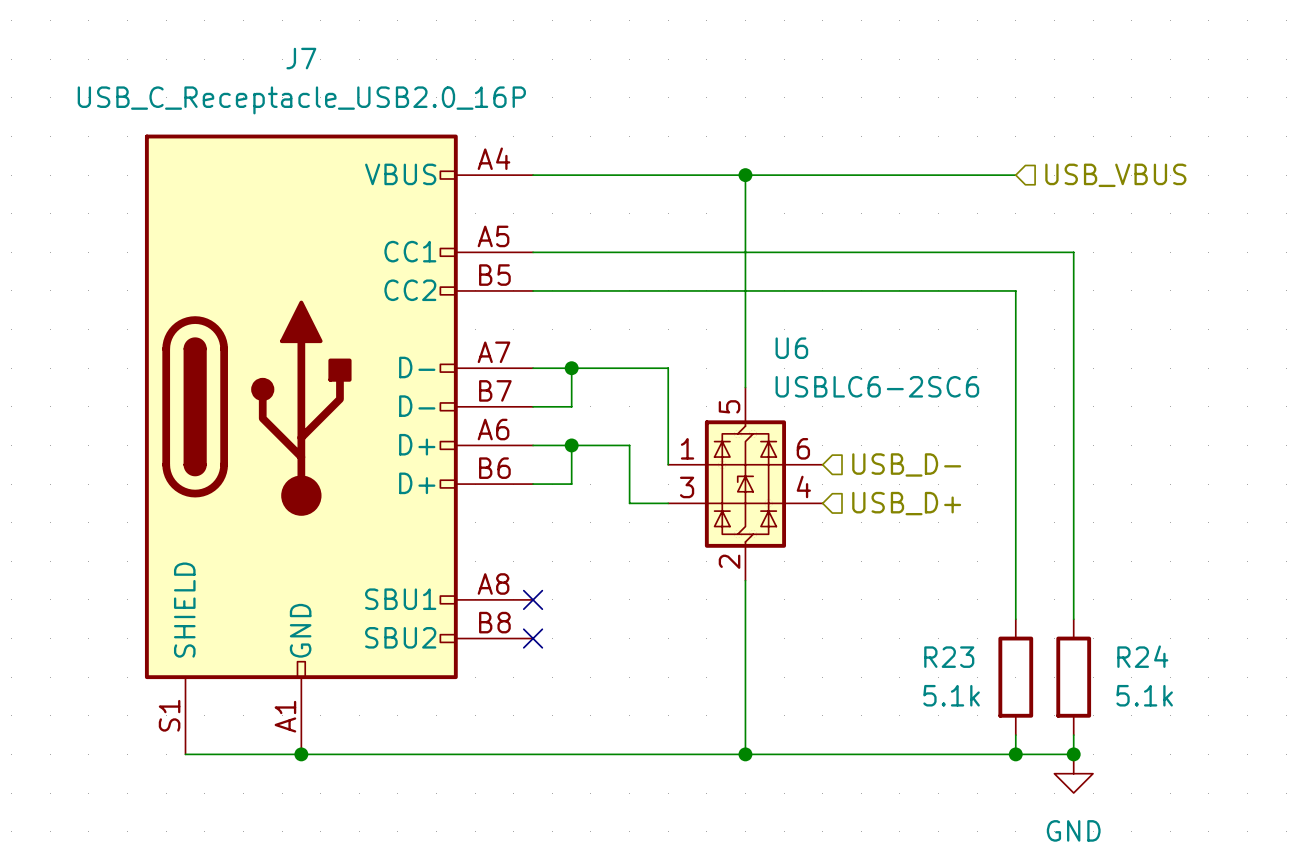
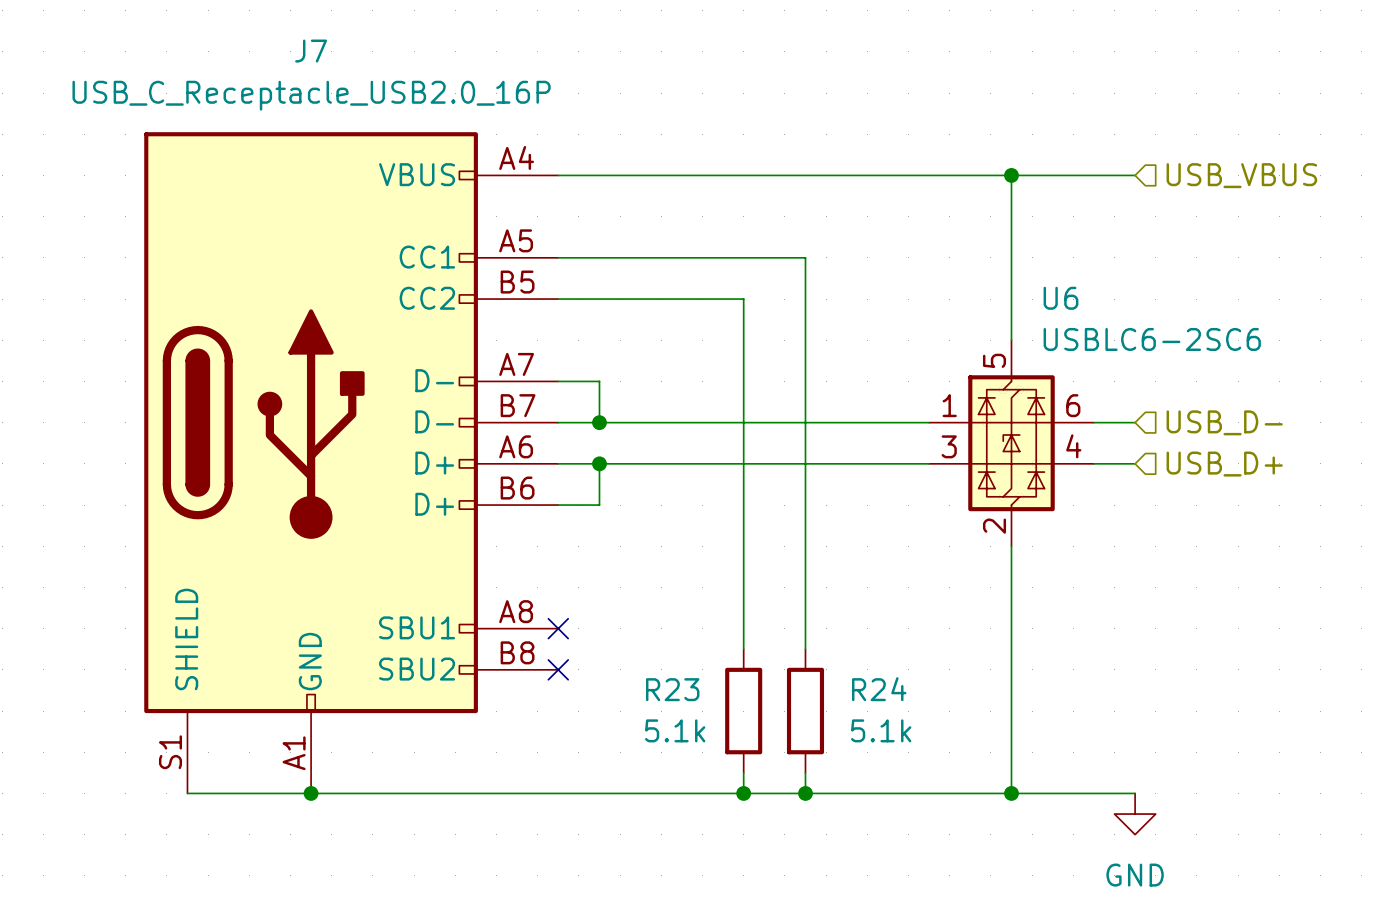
wire: (745, 175) (745, 387) -> none
junction: (745, 175) -> none
wire: none -> (1011, 175) (1011, 340)
junction: none -> (1011, 175)
wire: none -> (1073, 175) (1135, 175)
hierarchical label position: USB_VBUS (1115, 175) -> USB_VBUS (1241, 175)
wire: (764, 252) (1073, 252) (1073, 619) -> (805, 257) (805, 649)
wire: (706, 290) (1015, 290) (1015, 619) -> (743, 299) (743, 649)
wire: (571, 368) (668, 368) (668, 464) -> none
junction position: (571, 368) -> (599, 422)
wire: none -> (599, 422) (929, 422)
wire: none -> (1093, 422) (1135, 422)
wire: (629, 445) (629, 503) (668, 503) -> (661, 463) (929, 463)
wire: none -> (1093, 463) (1135, 463)
hierarchical label position: USB_D- (906, 464) -> USB_D- (1224, 422)
U6 position: (745, 484) -> (1011, 443)
hierarchical label position: USB_D+ (906, 503) -> USB_D+ (1224, 464)
wire: none -> (1011, 546) (1011, 793)
wire: (745, 580) (745, 754) -> none
R23 position: (1015, 677) -> (743, 711)
R24 position: (1073, 677) -> (805, 711)
wire: (1015, 735) (1015, 754) -> (743, 772) (743, 793)
wire: (1073, 735) (1073, 754) -> (805, 772) (805, 793)
junction: none -> (743, 793)
junction: (745, 754) -> none
junction: none -> (805, 793)
junction: none -> (1011, 793)
junction: (1015, 754) -> none
junction: (1073, 754) -> none

